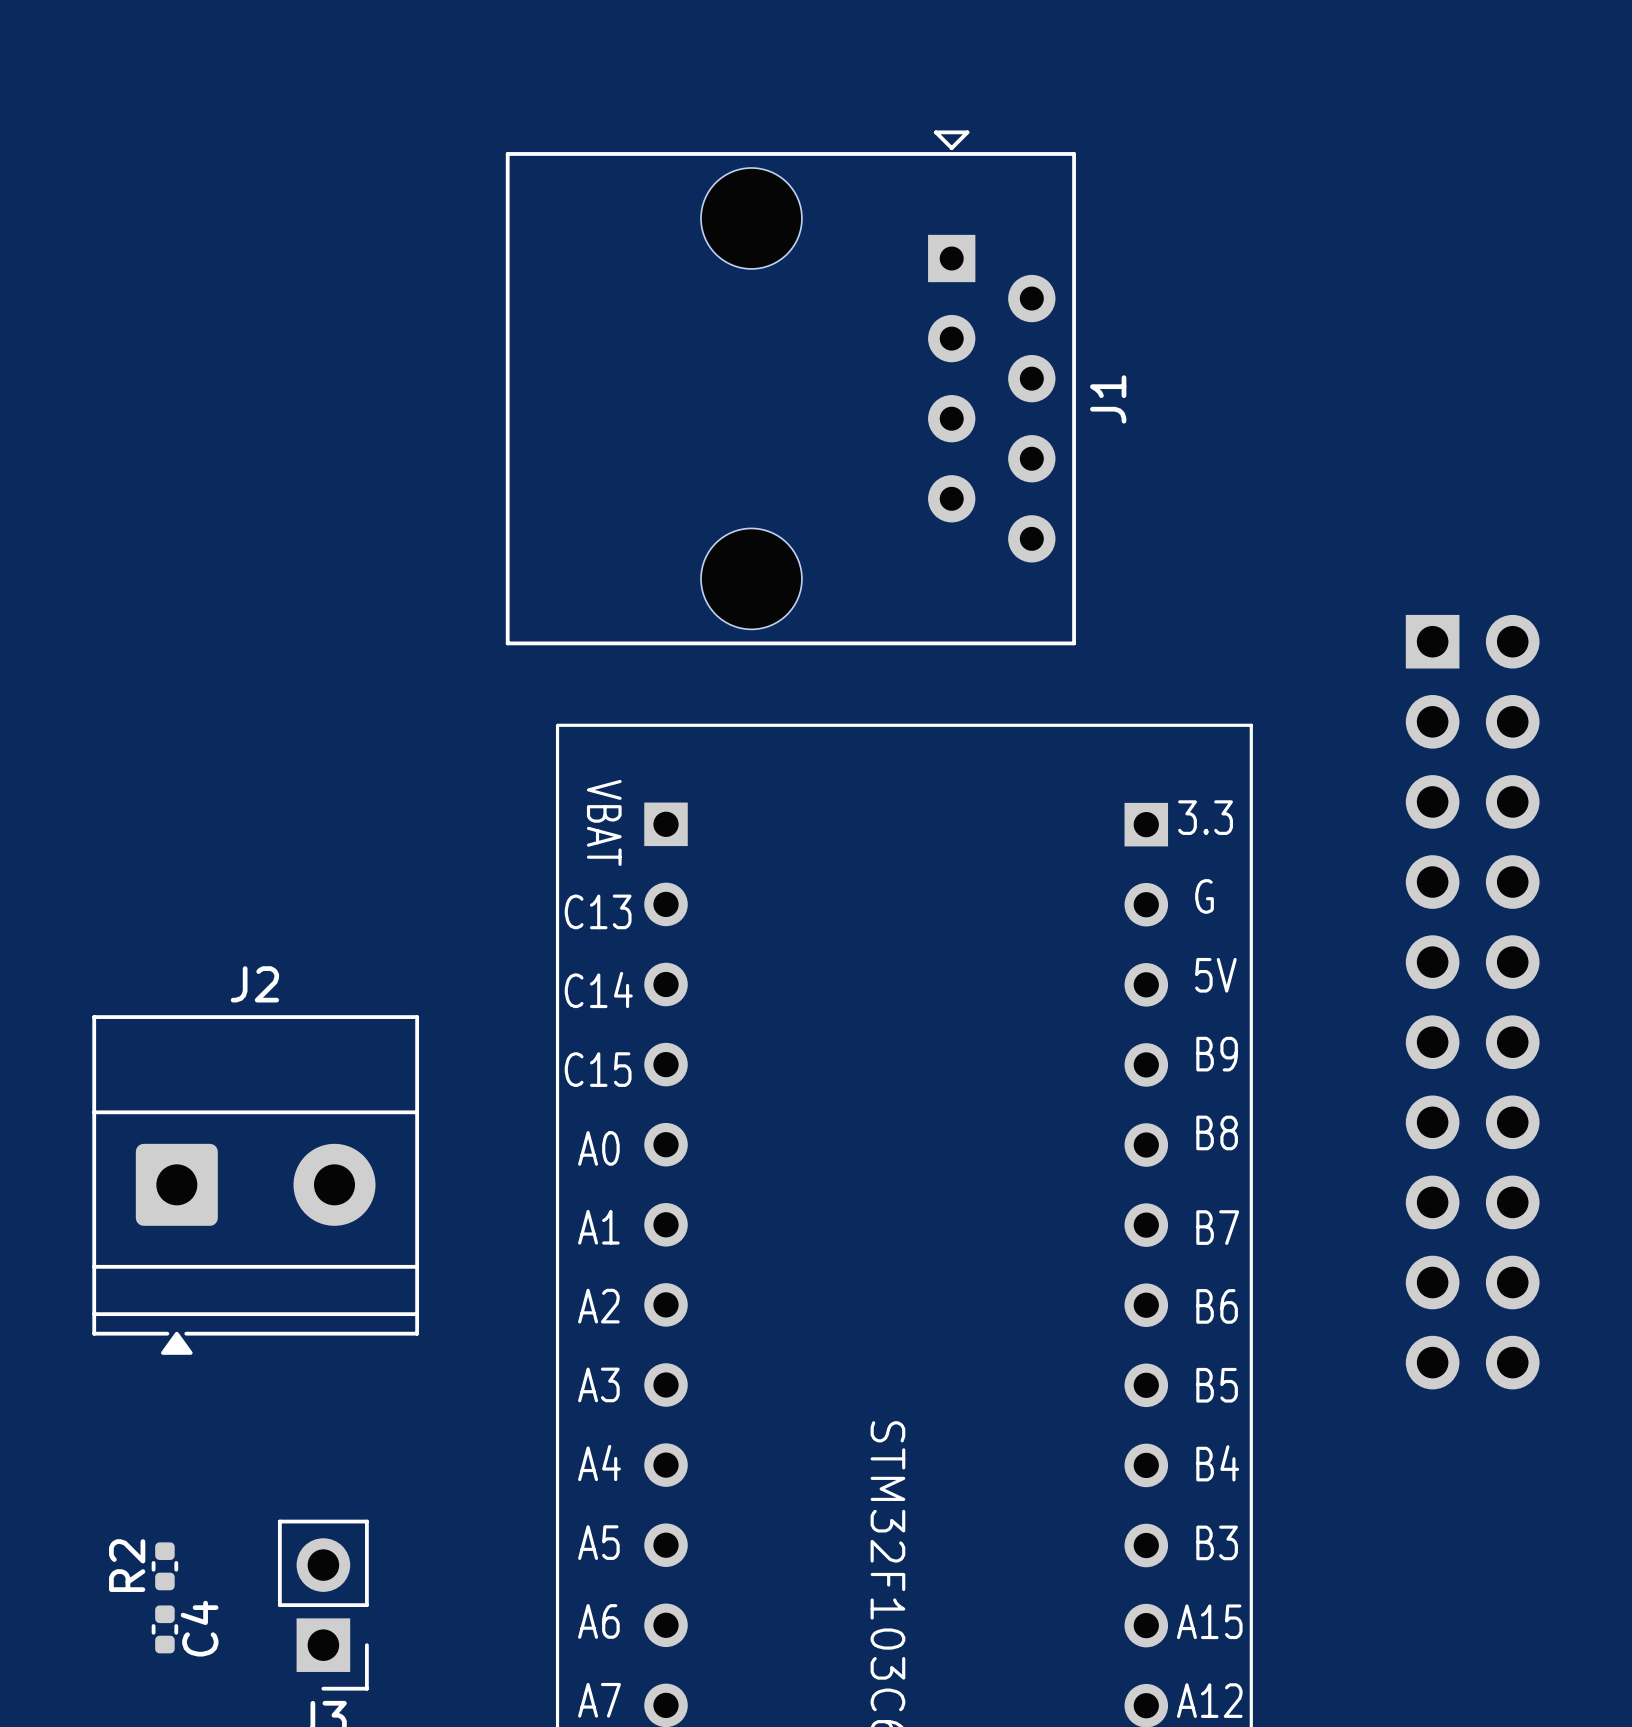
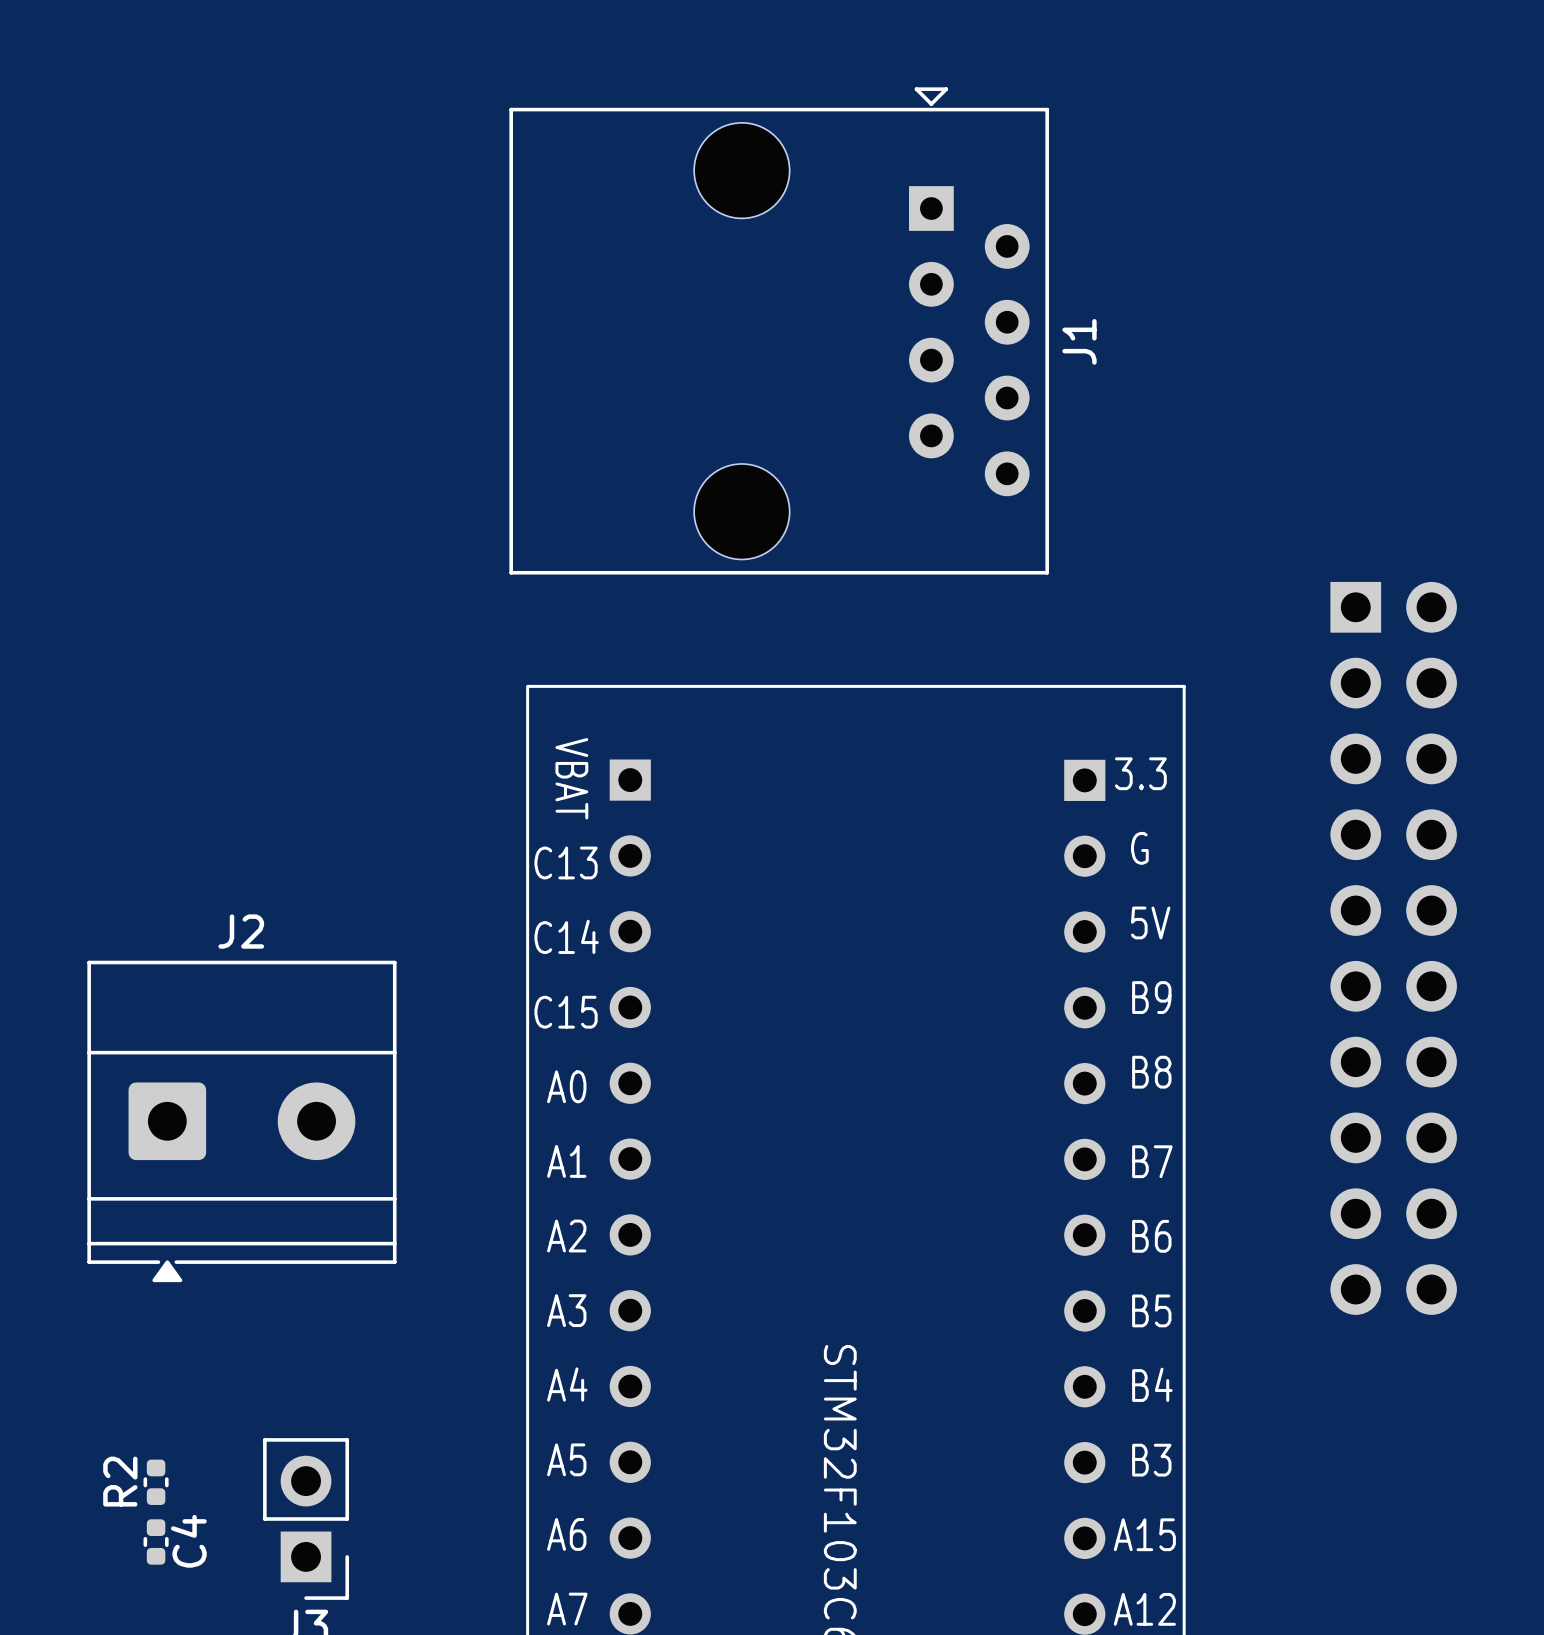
J1 position: (790, 387) -> (779, 330)

